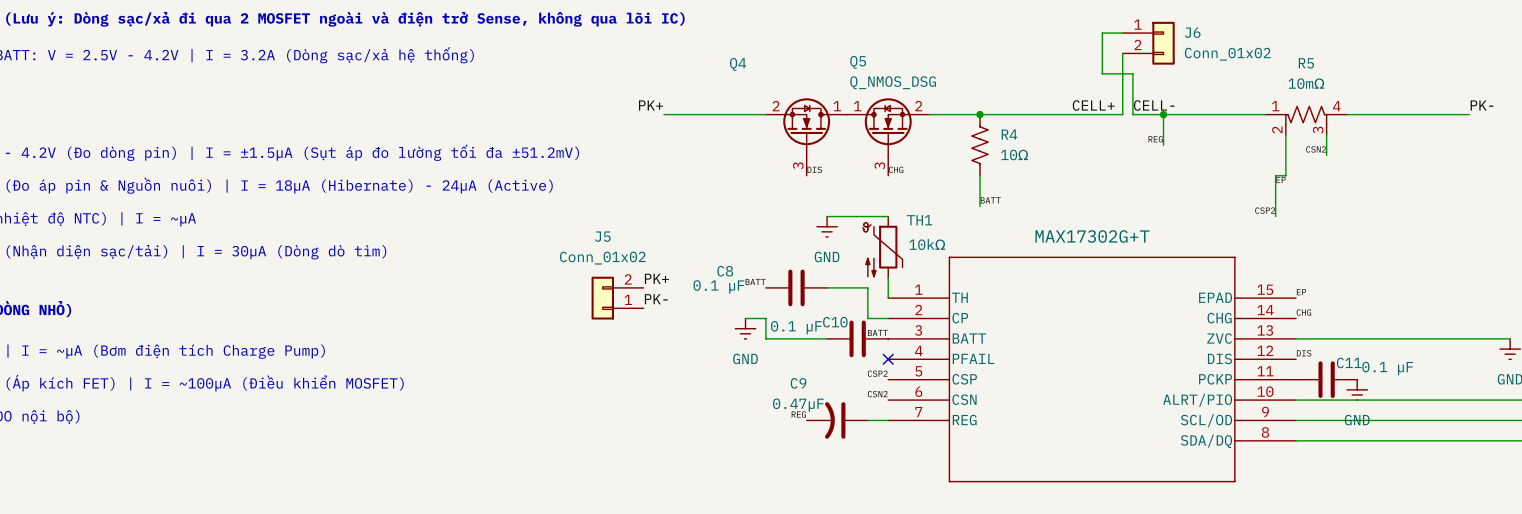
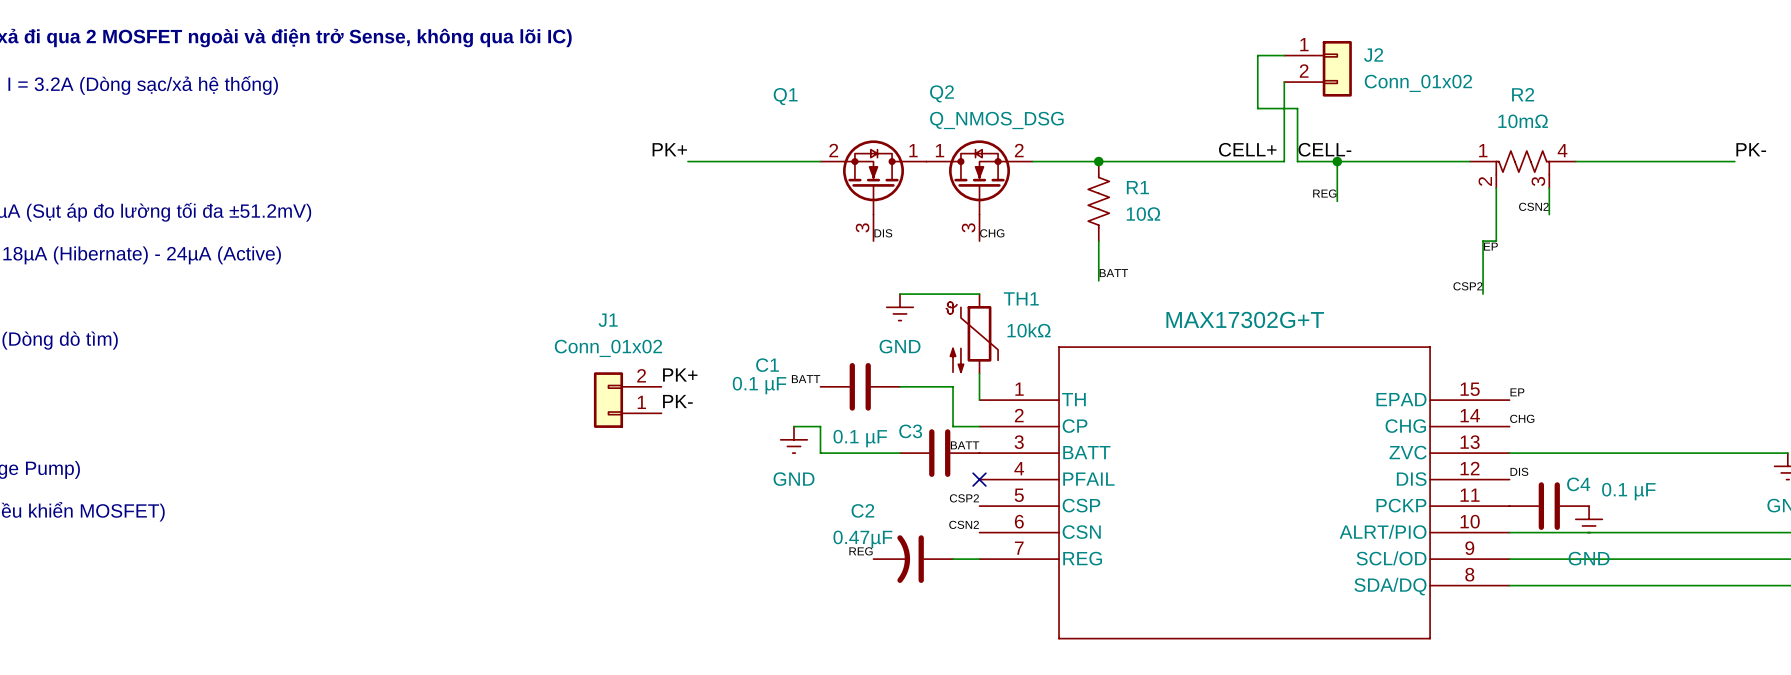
J6 name: J6 (1192, 32) -> J2 (1373, 55)
Q5 name: Q5 (858, 62) -> Q2 (941, 93)
R5 name: R5 (1306, 63) -> R2 (1523, 94)
Q4 name: Q4 (738, 64) -> Q1 (785, 96)
R4 name: R4 (1009, 134) -> R1 (1137, 187)
J5 name: J5 (602, 236) -> J1 (608, 320)
C8 name: C8 (725, 271) -> C1 (767, 365)
C10 name: C10 (835, 322) -> C3 (910, 431)
C11 name: C11 (1349, 362) -> C4 (1578, 484)
C9 name: C9 (798, 383) -> C2 (862, 510)

